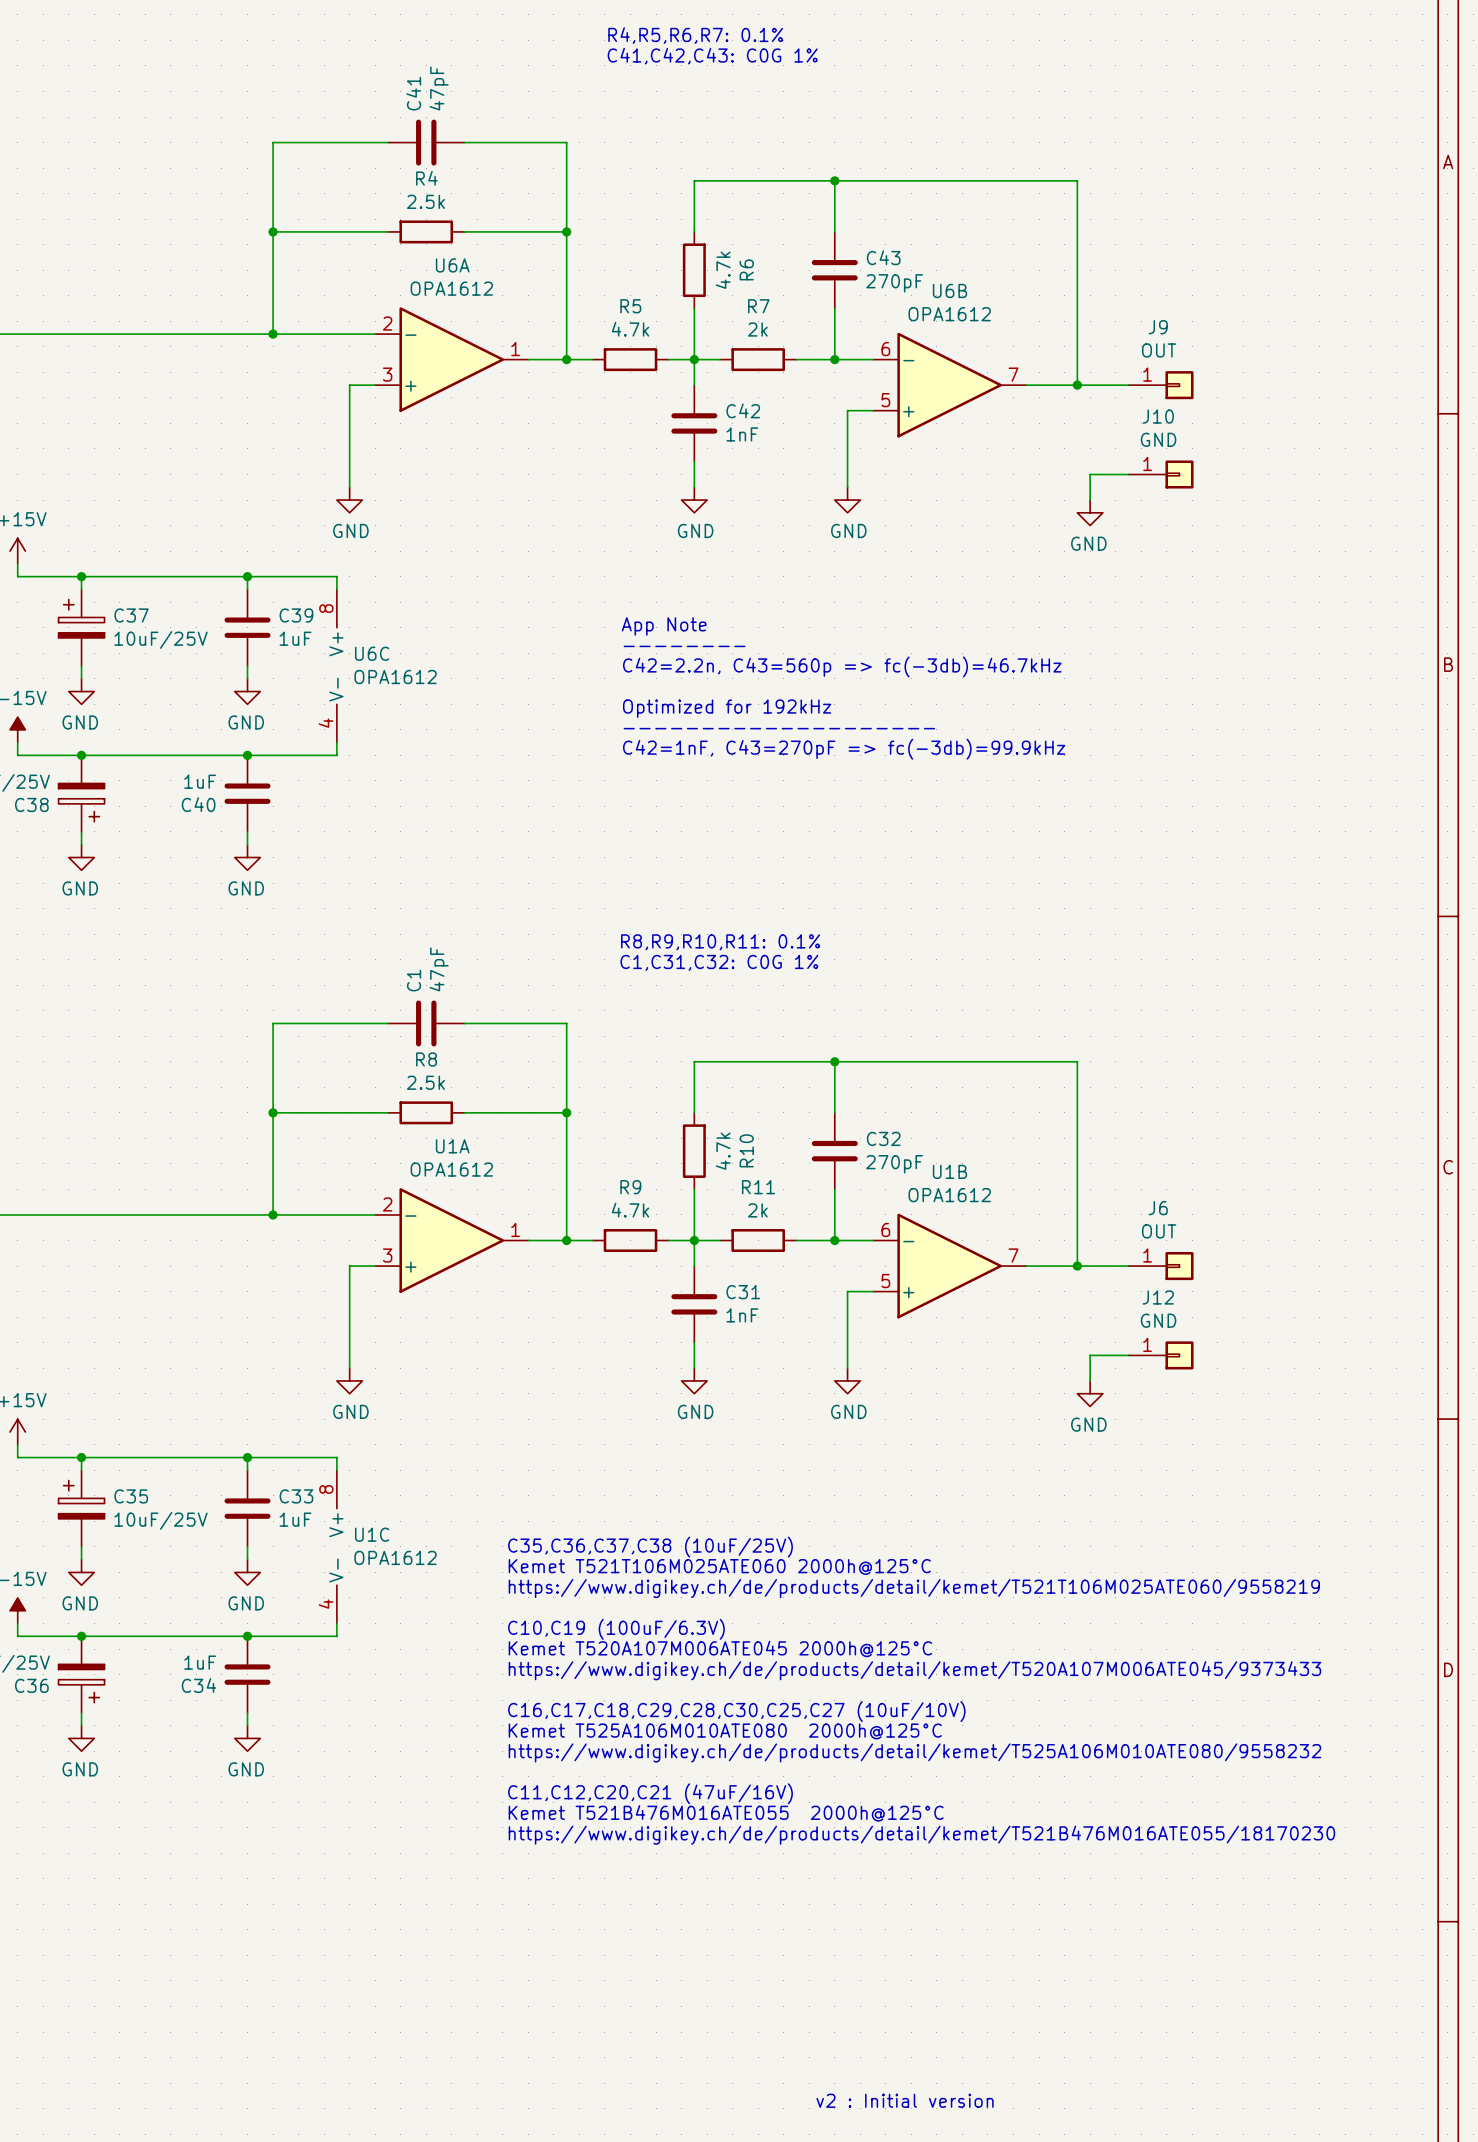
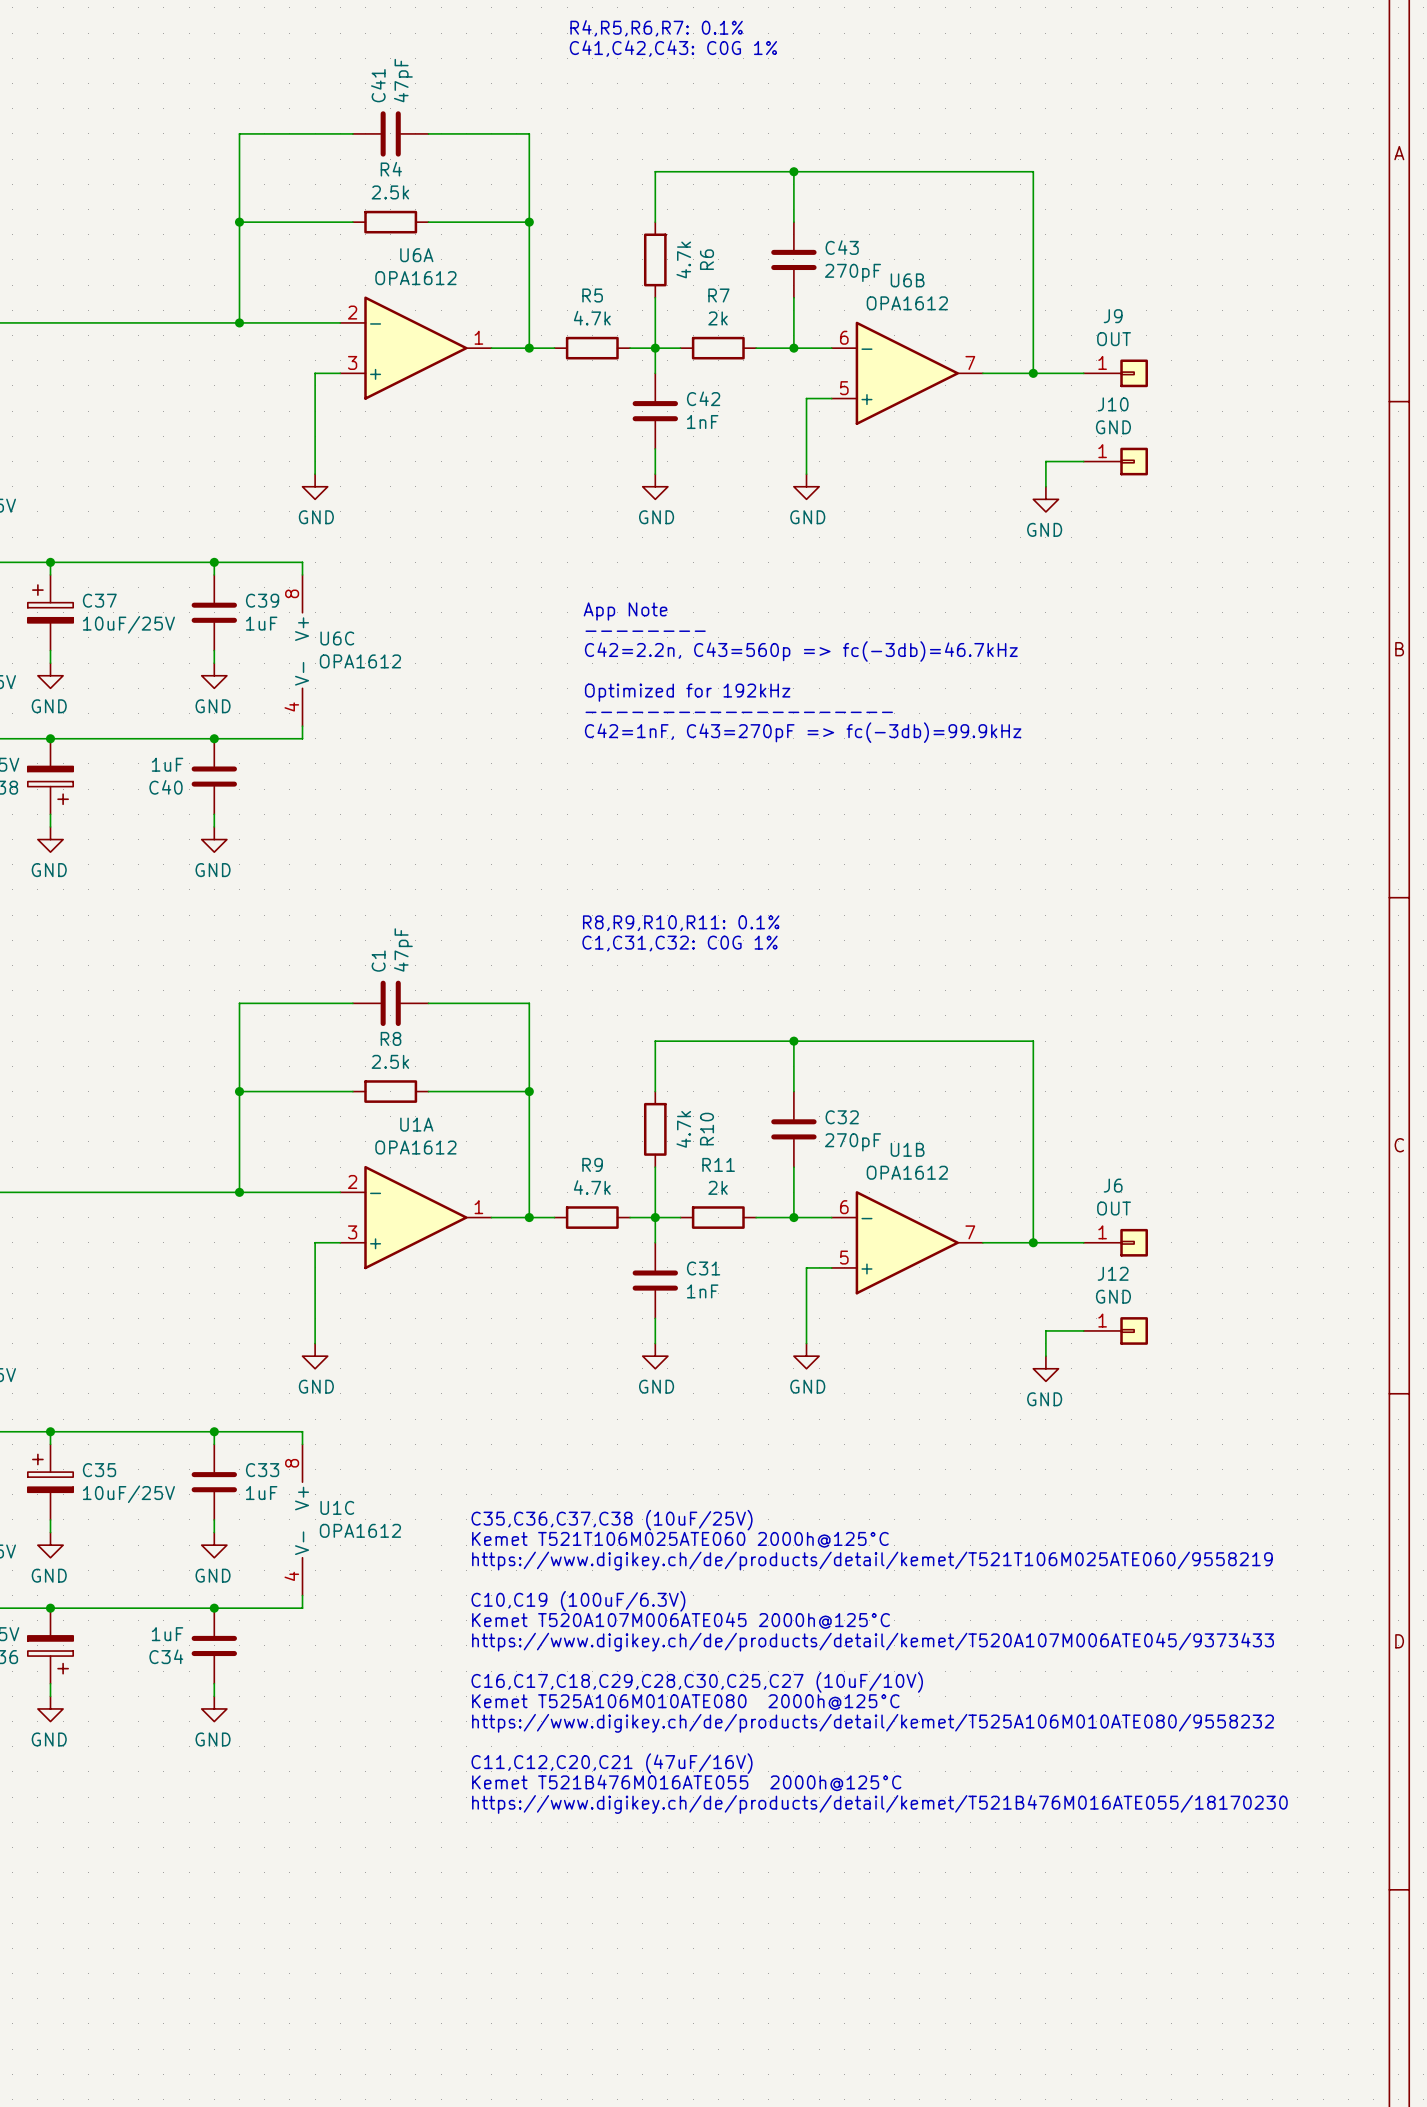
text: v2 : Initial version (905, 2100) -> none

